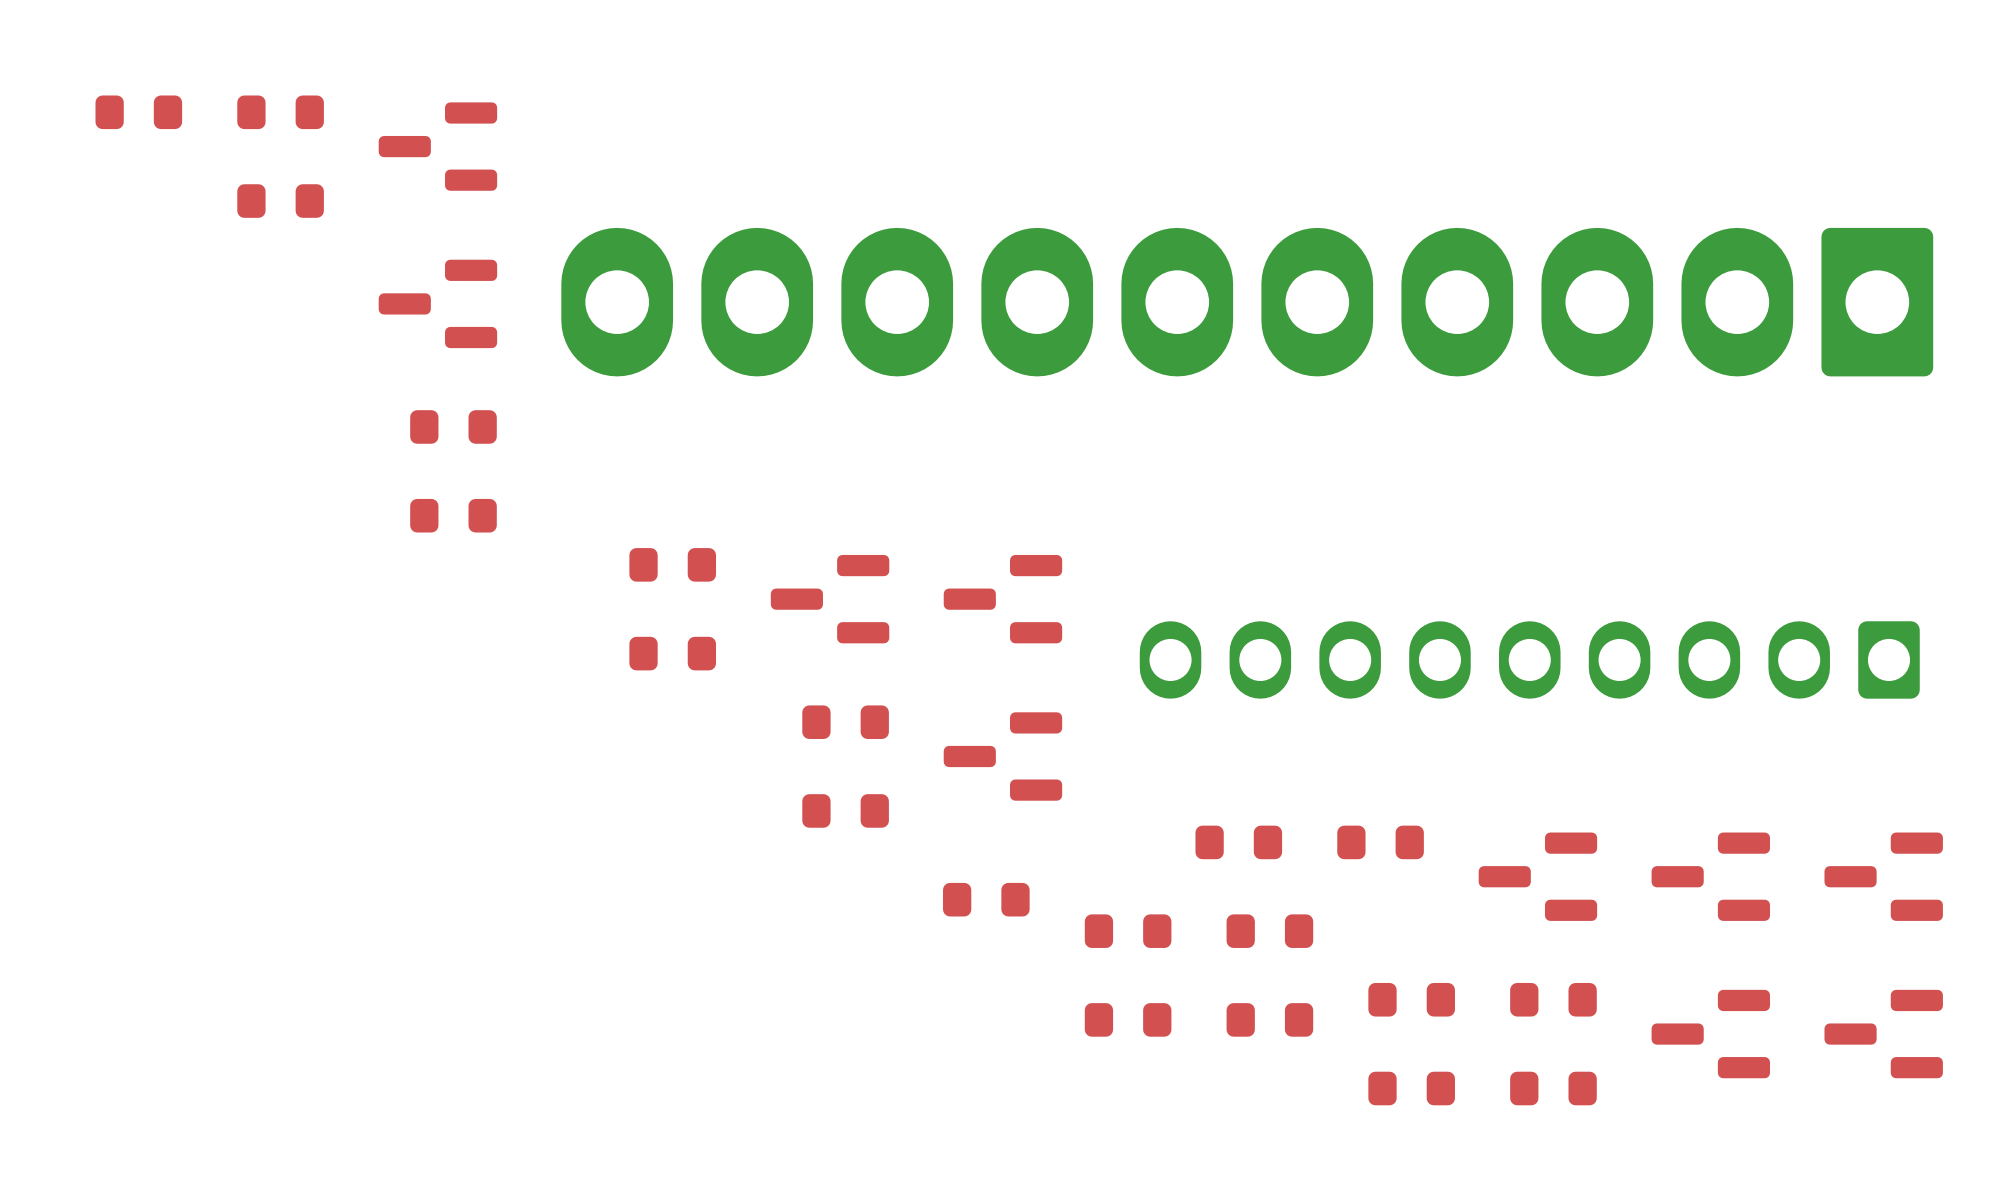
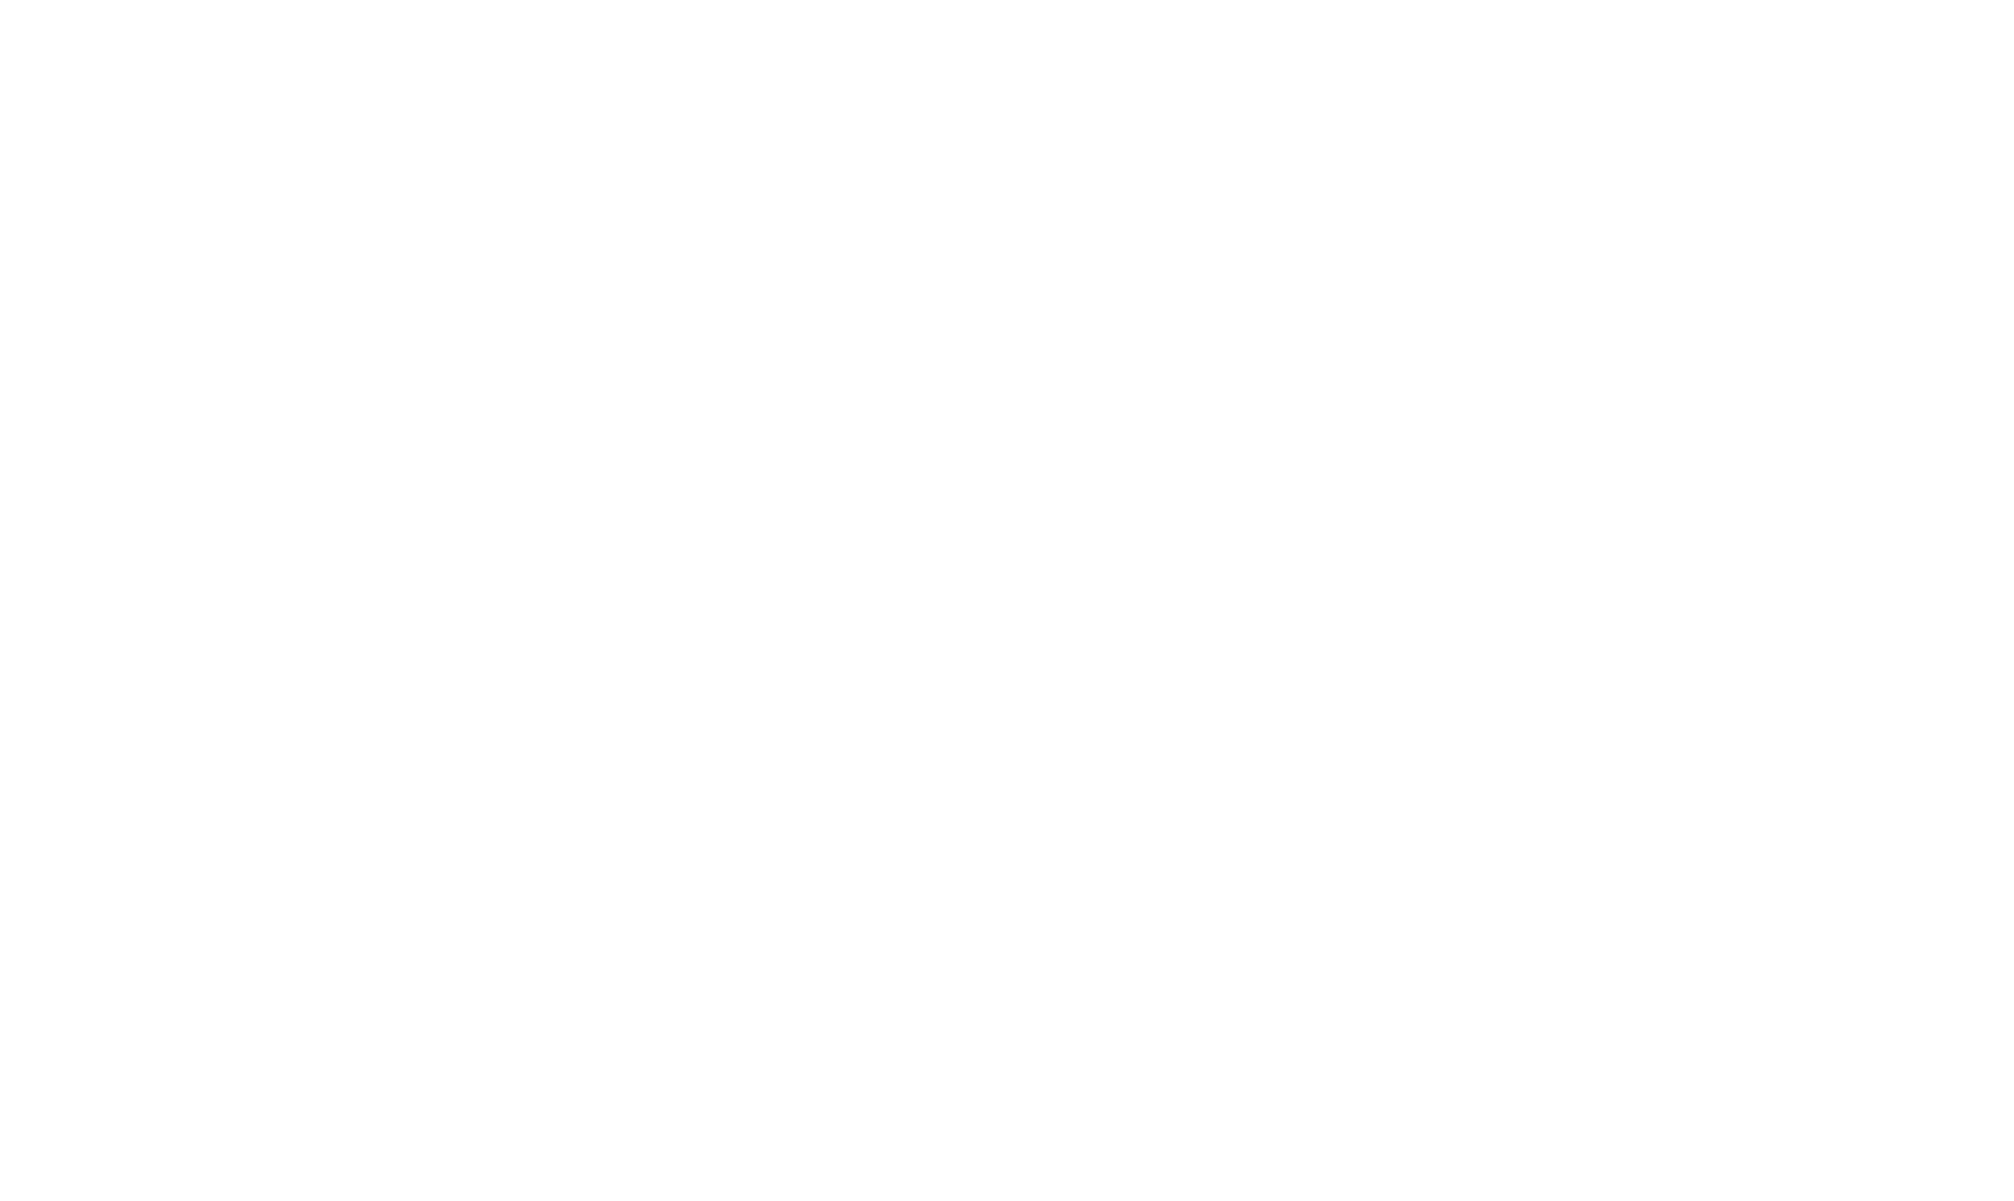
part: (138, 112) -> none
part: (280, 112) -> none
part: (437, 146) -> none
part: (280, 201) -> none
part: (1247, 302) -> none
part: (437, 303) -> none
part: (453, 426) -> none
part: (453, 515) -> none
part: (672, 564) -> none
part: (830, 599) -> none
part: (1002, 599) -> none
part: (672, 653) -> none
part: (1529, 659) -> none
part: (845, 722) -> none
part: (1002, 756) -> none
part: (845, 810) -> none
part: (1238, 842) -> none
part: (1380, 842) -> none
part: (1537, 876) -> none
part: (1710, 876) -> none
part: (1883, 876) -> none
part: (986, 899) -> none
part: (1128, 931) -> none
part: (1269, 931) -> none
part: (1411, 999) -> none
part: (1553, 999) -> none
part: (1128, 1019) -> none
part: (1269, 1019) -> none
part: (1710, 1034) -> none
part: (1883, 1034) -> none
part: (1411, 1088) -> none
part: (1553, 1088) -> none

